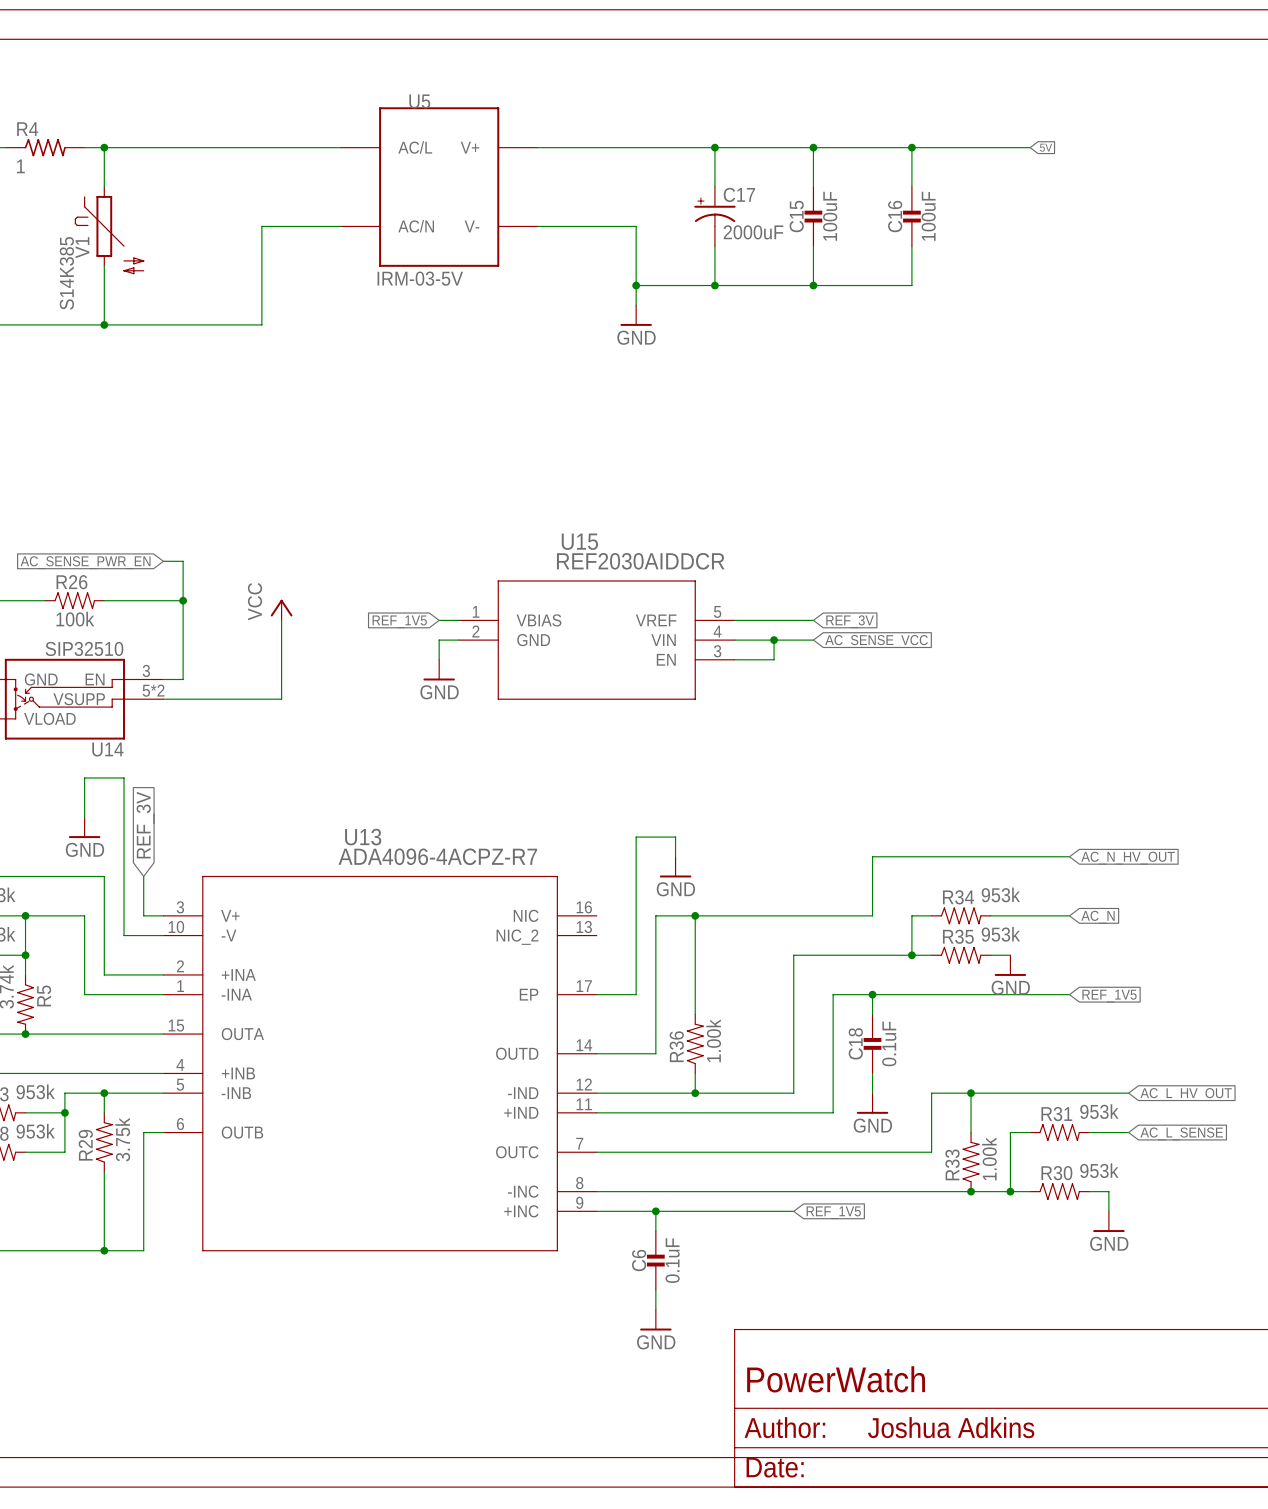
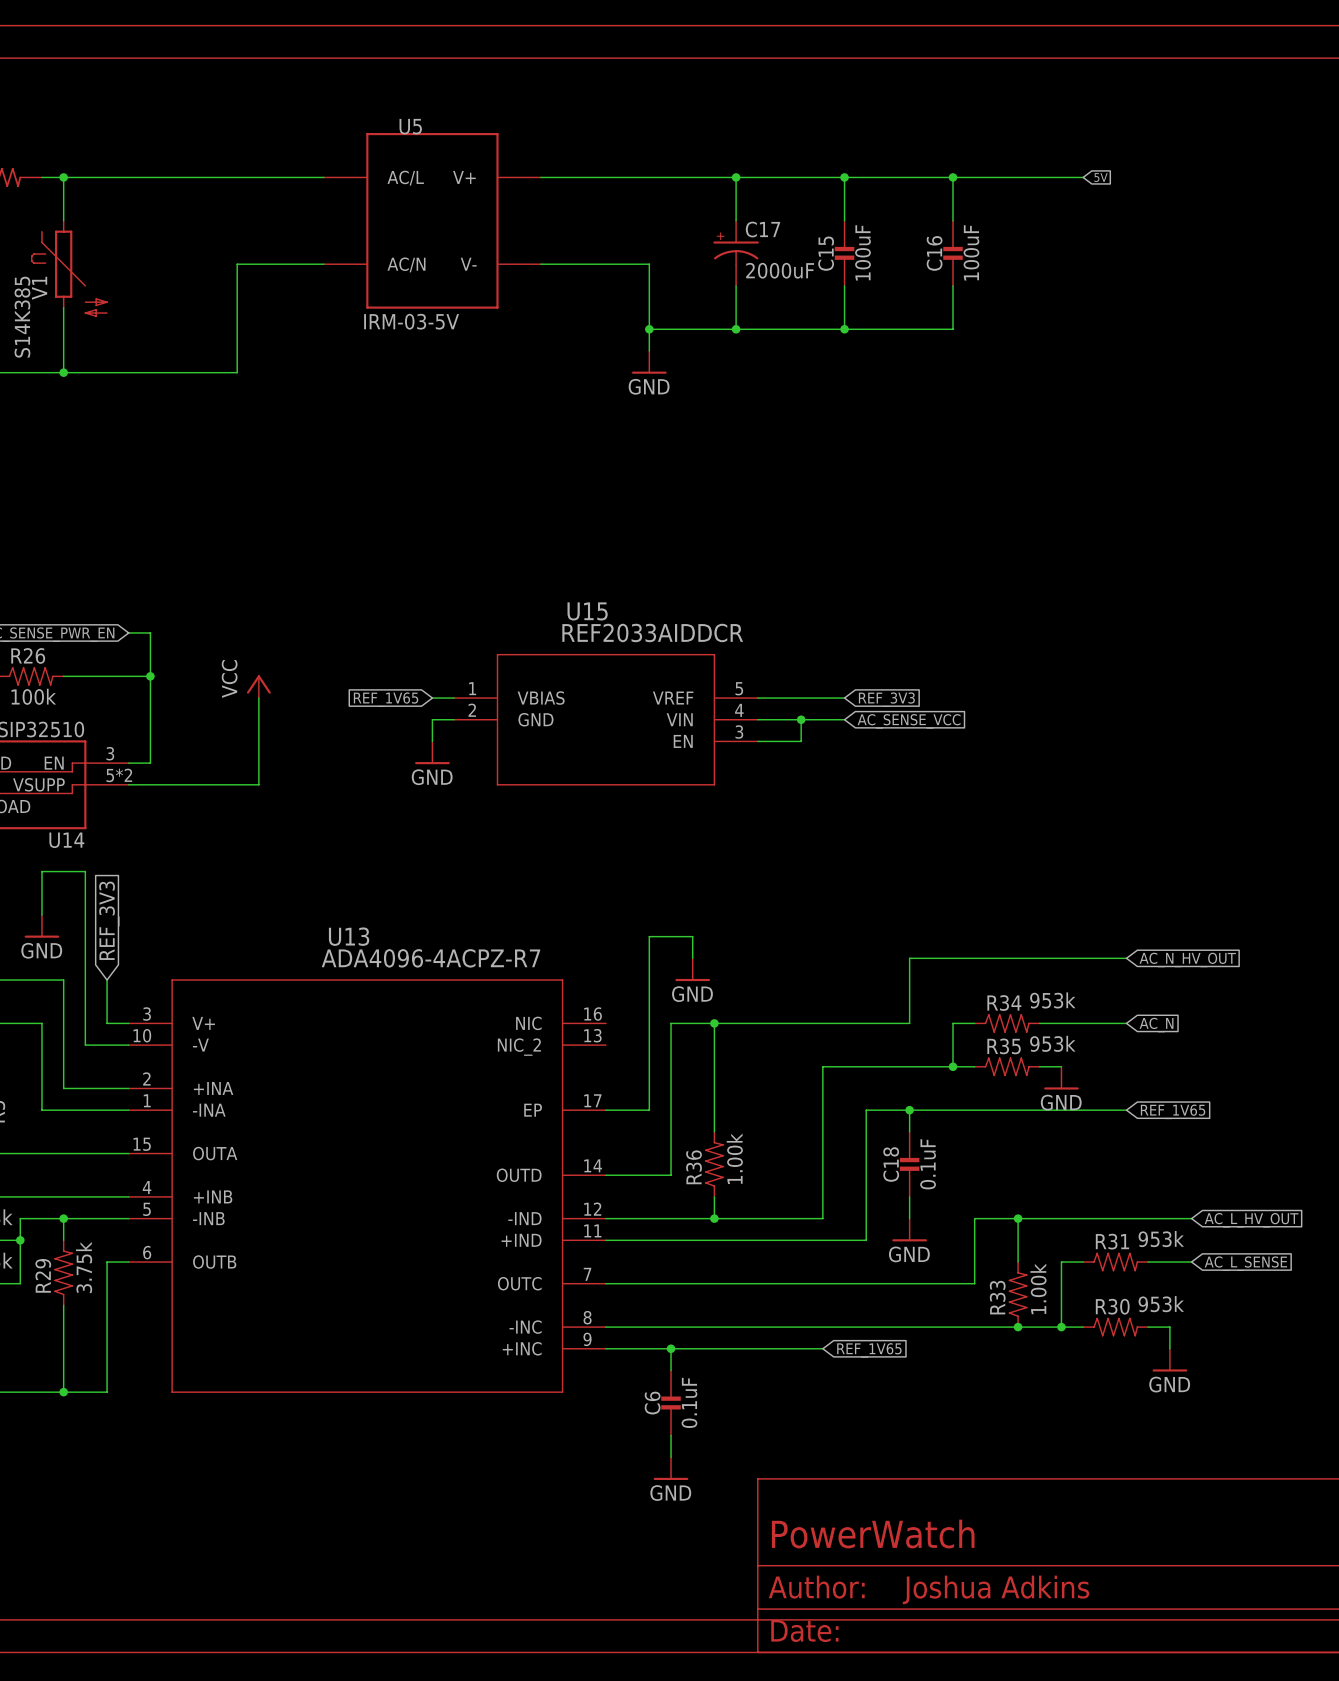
U15 value: REF2030AIDDCR (640, 561) -> REF2033AIDDCR (652, 632)
global label: REF_1V5 (399, 621) -> REF_1V65 (386, 699)
global label: REF_3V (850, 621) -> REF_3V3 (886, 699)
global label: REF_3V (145, 825) -> REF_3V3 (109, 920)
global label: REF_1V5 (1109, 996) -> REF_1V65 (1173, 1111)
global label: REF_1V5 (833, 1212) -> REF_1V65 (869, 1350)

